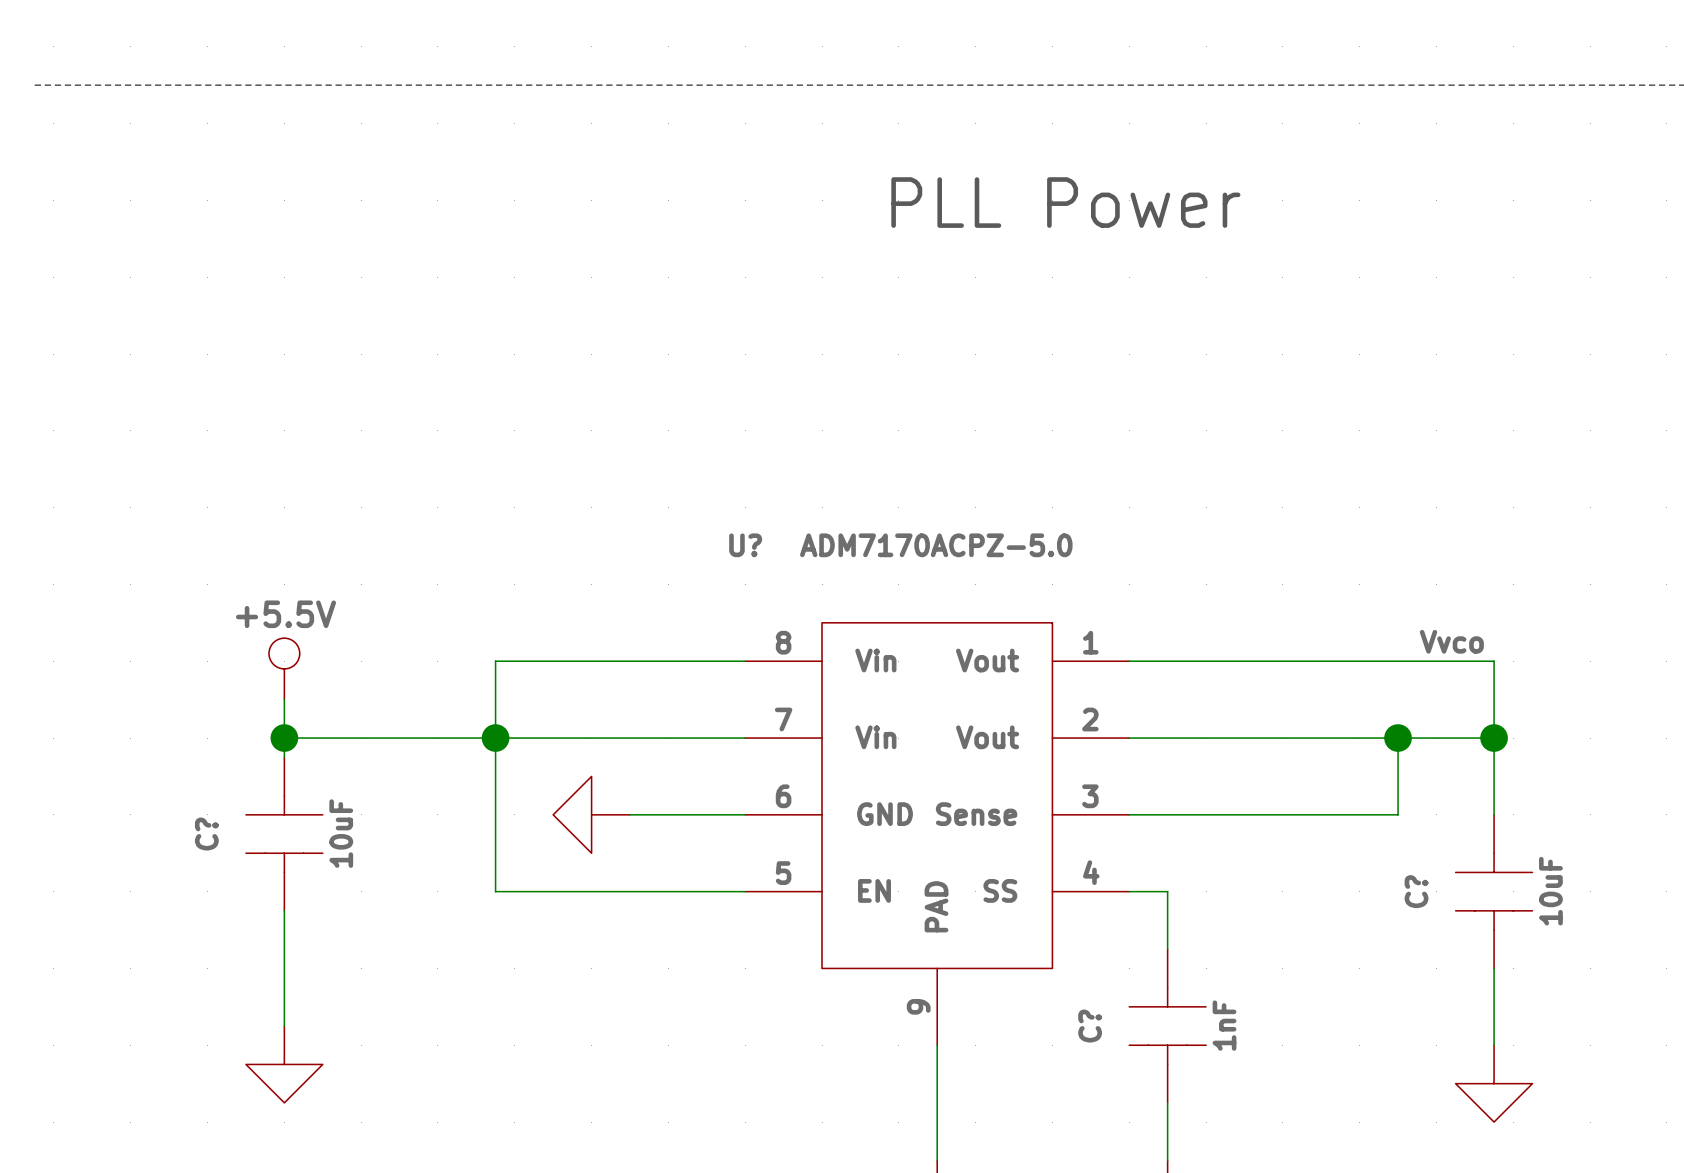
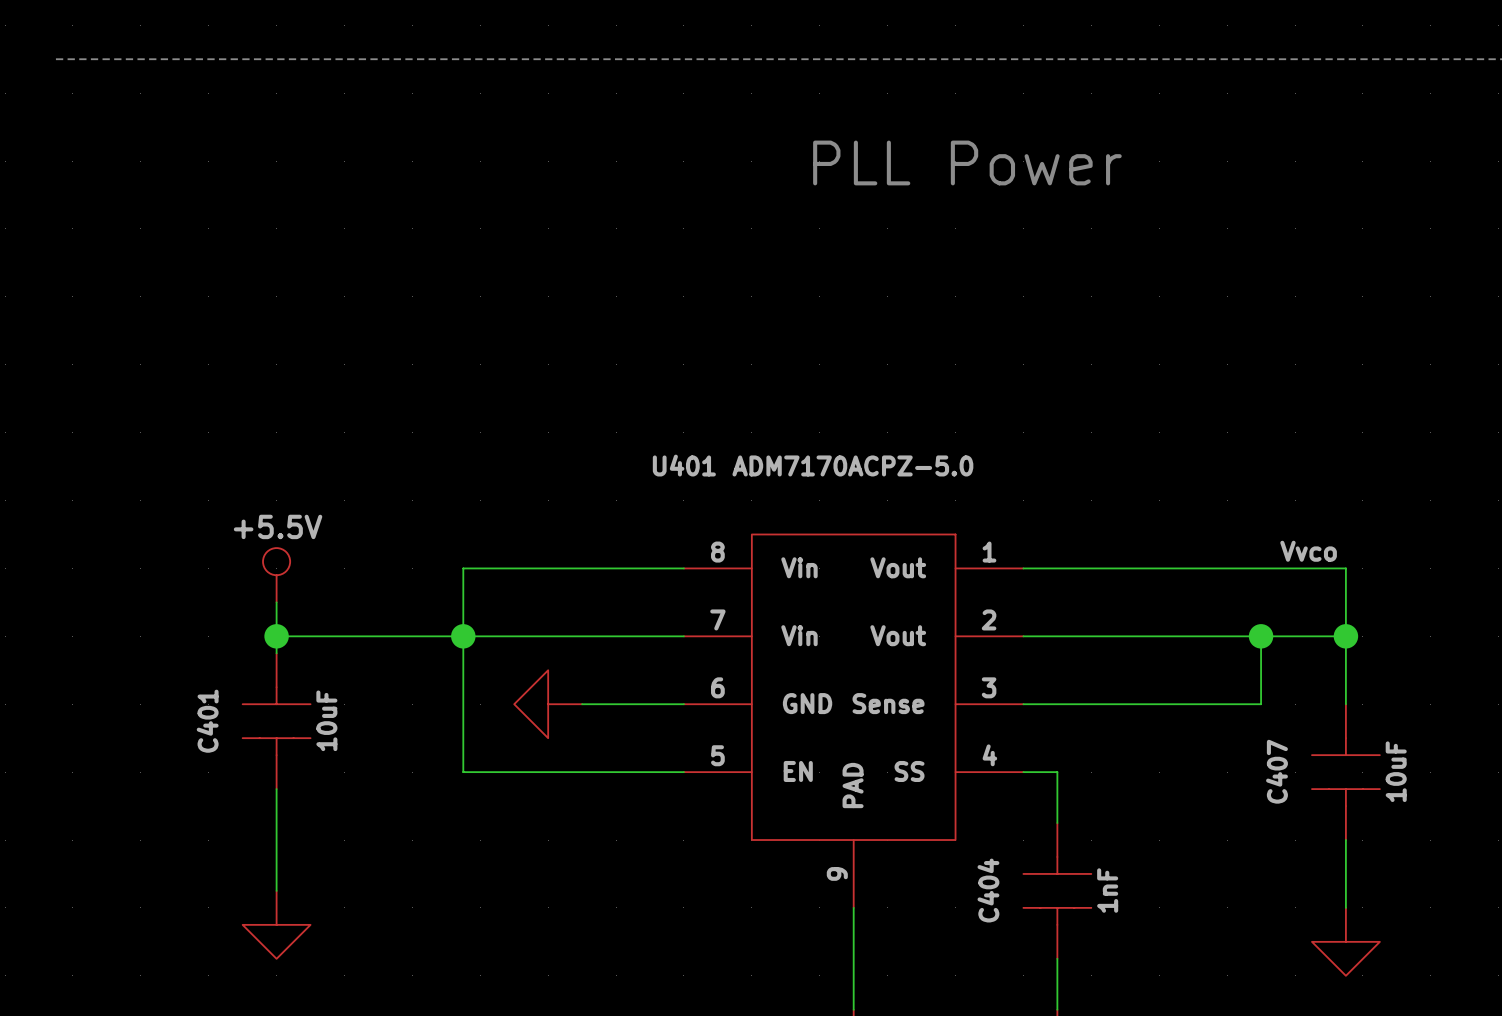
U? name: U? (745, 545) -> U401 (684, 465)
C? name: C? (206, 834) -> C401 (207, 721)
C? name: C? (1416, 891) -> C407 (1276, 771)
C? name: C? (1090, 1026) -> C404 (988, 890)

